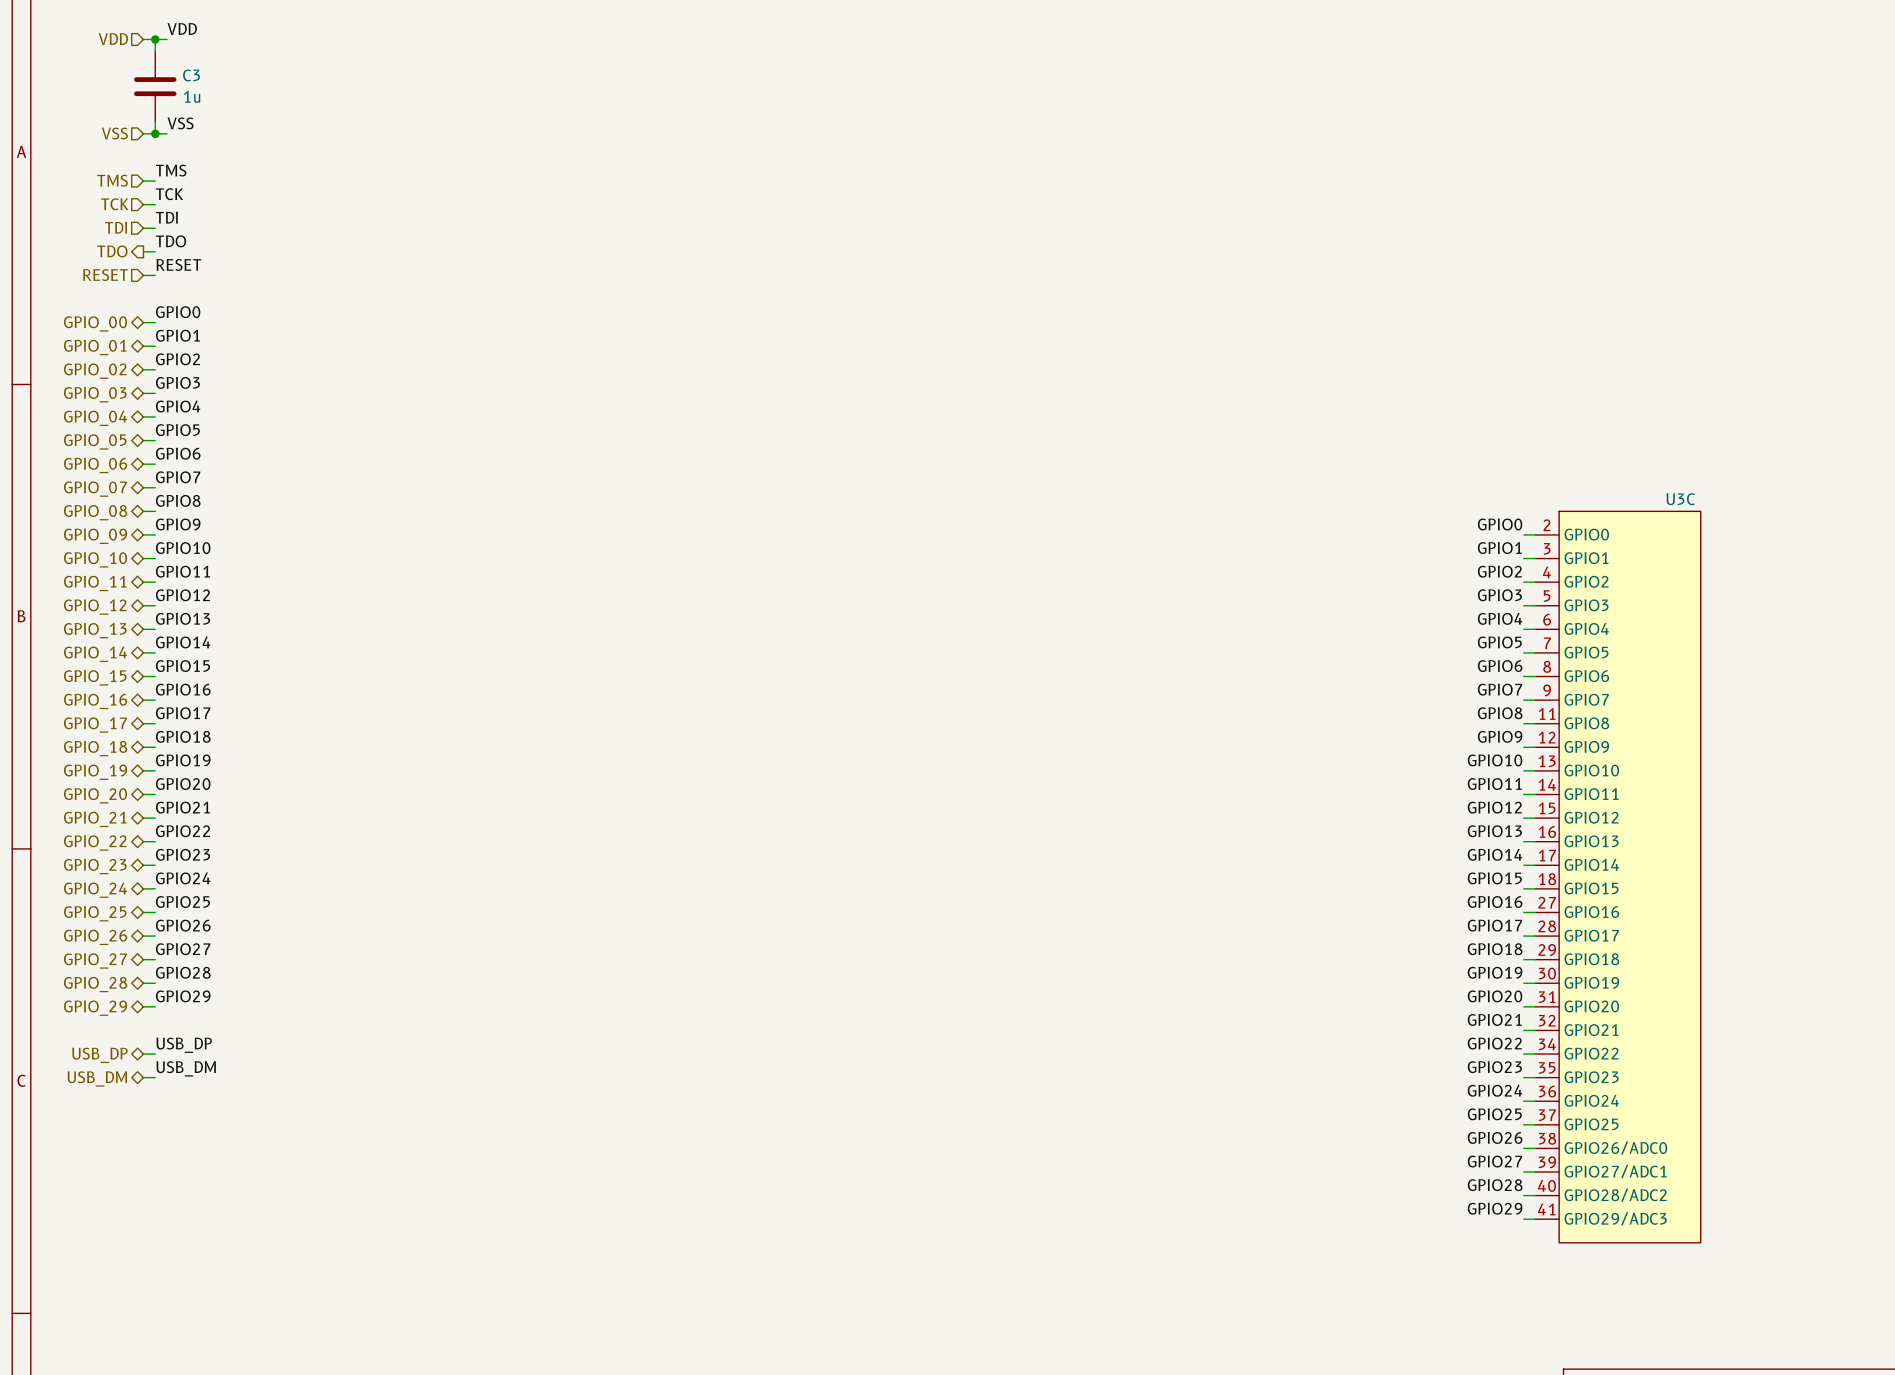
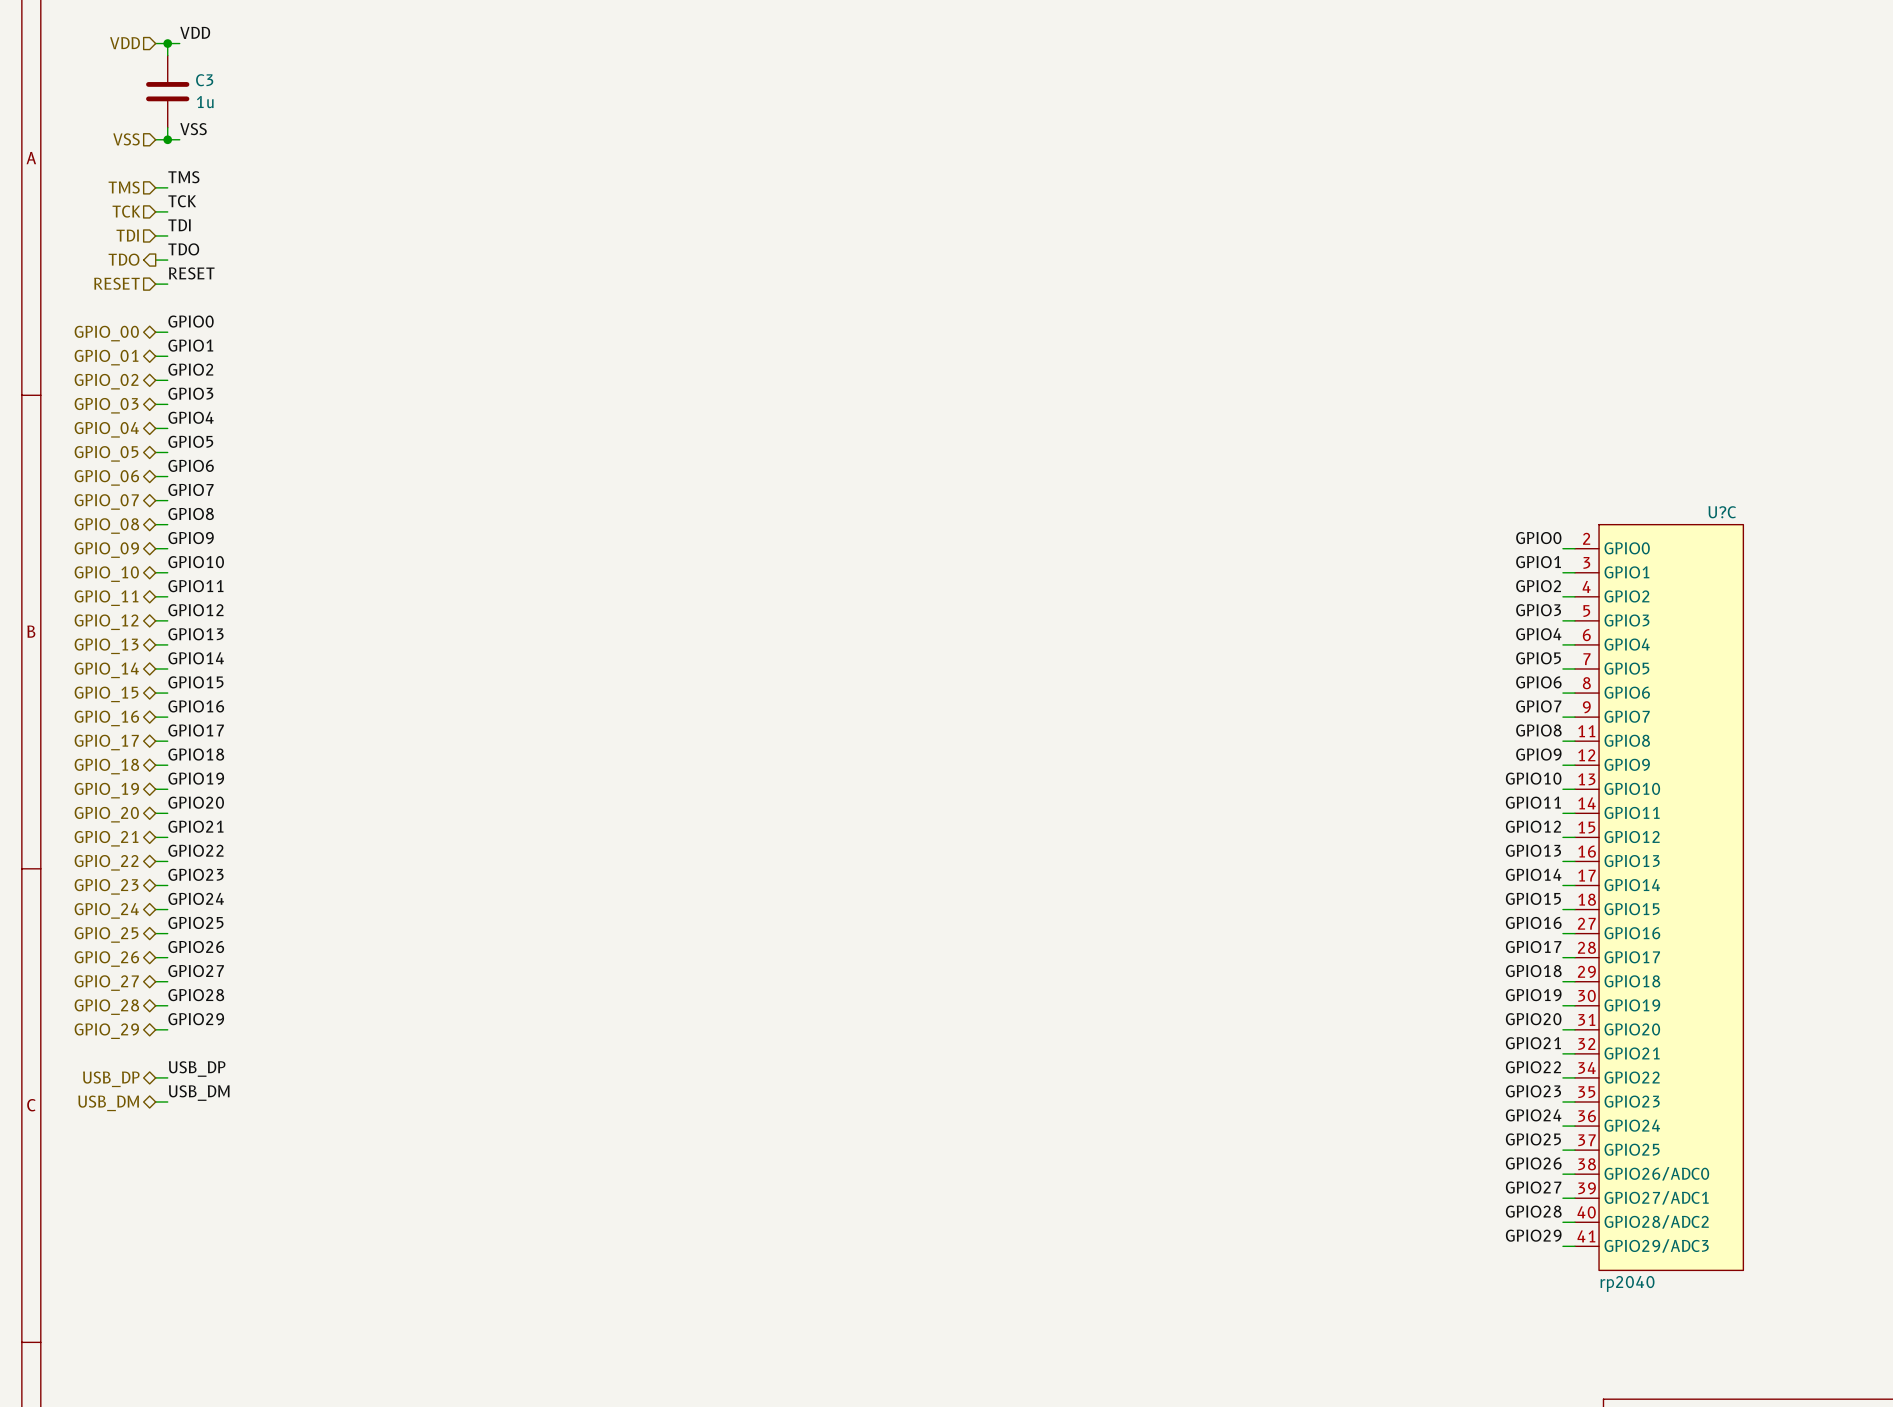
U3C name: U3C (1680, 499) -> U?C (1722, 512)
U3C value: none -> rp2040 (1627, 1283)

